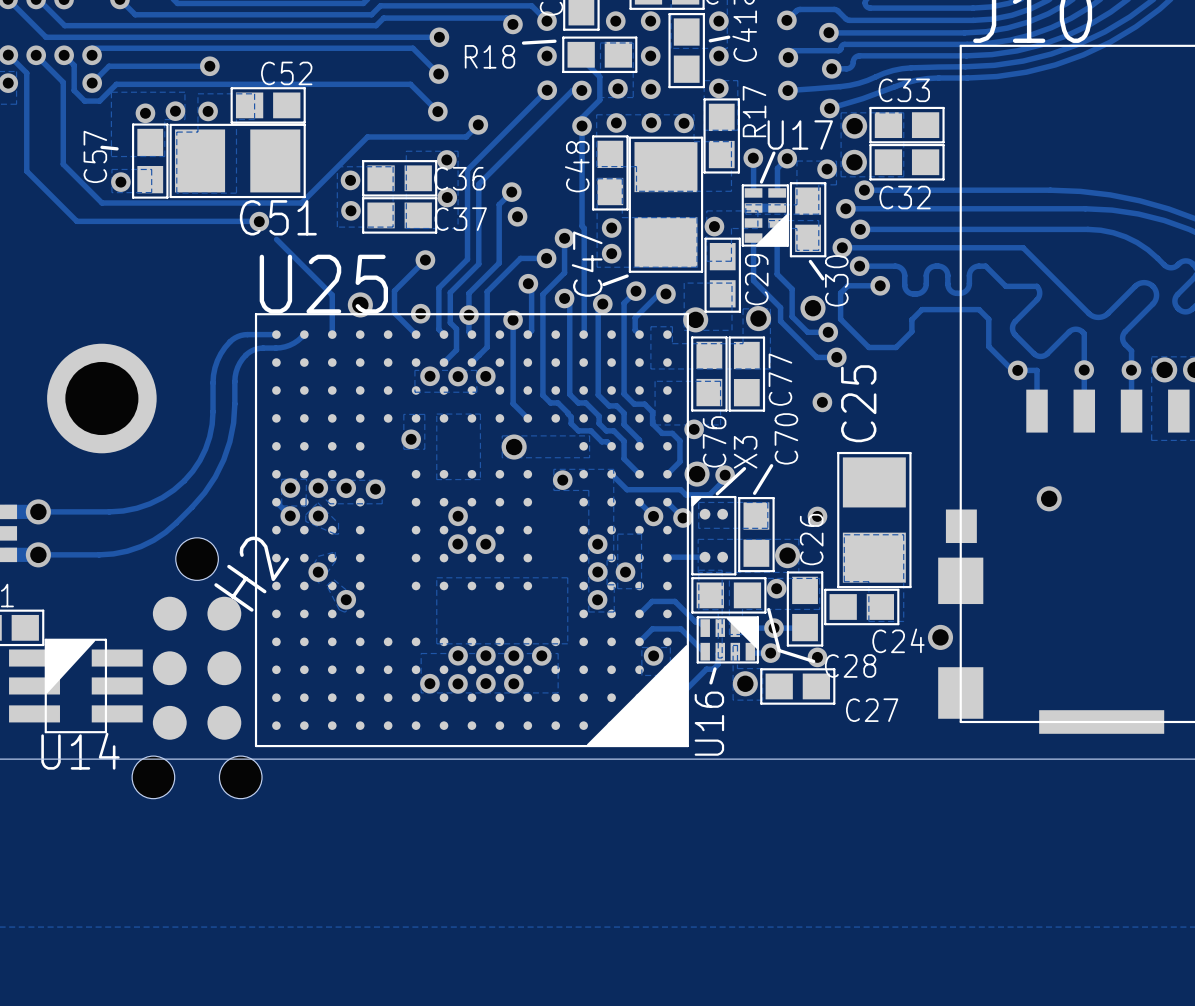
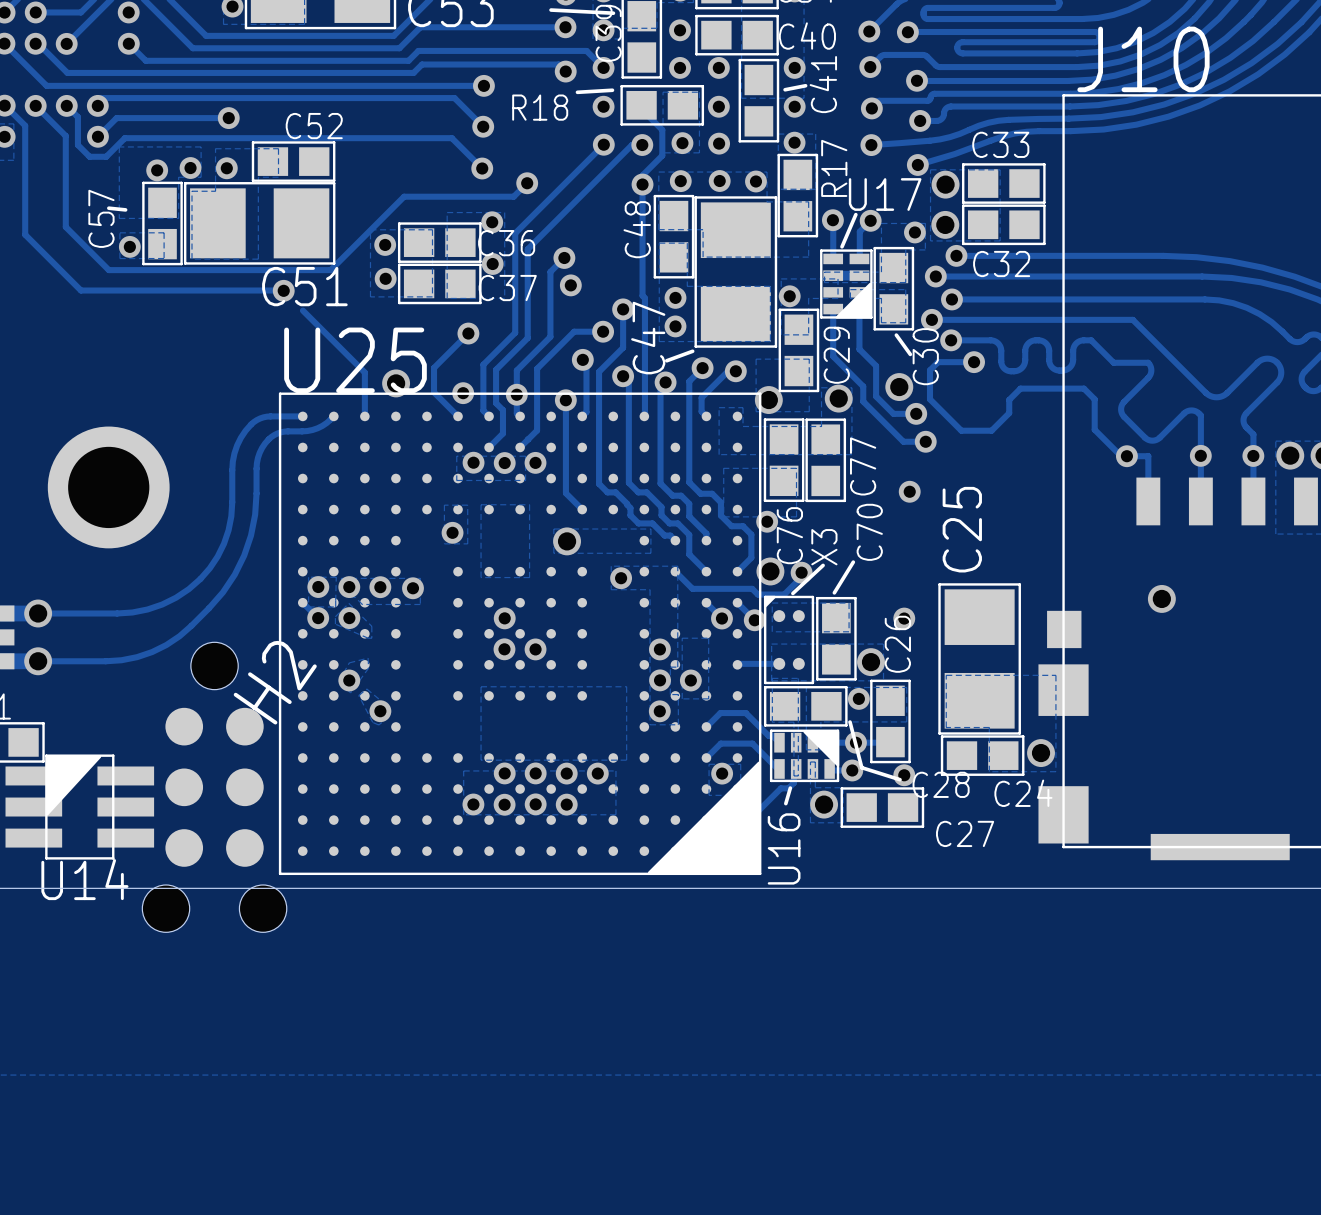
C25 position: (874, 520) -> (979, 658)
zone outline: (903, 534) (903, 621) (868, 621) (868, 581) (844, 581) (844, 534) (903, 534) -> none
zone outline: none -> (1055, 675) (1055, 771) (989, 771) (989, 727) (946, 727) (946, 675) (1055, 675)
C24 position: (861, 606) -> (982, 755)

